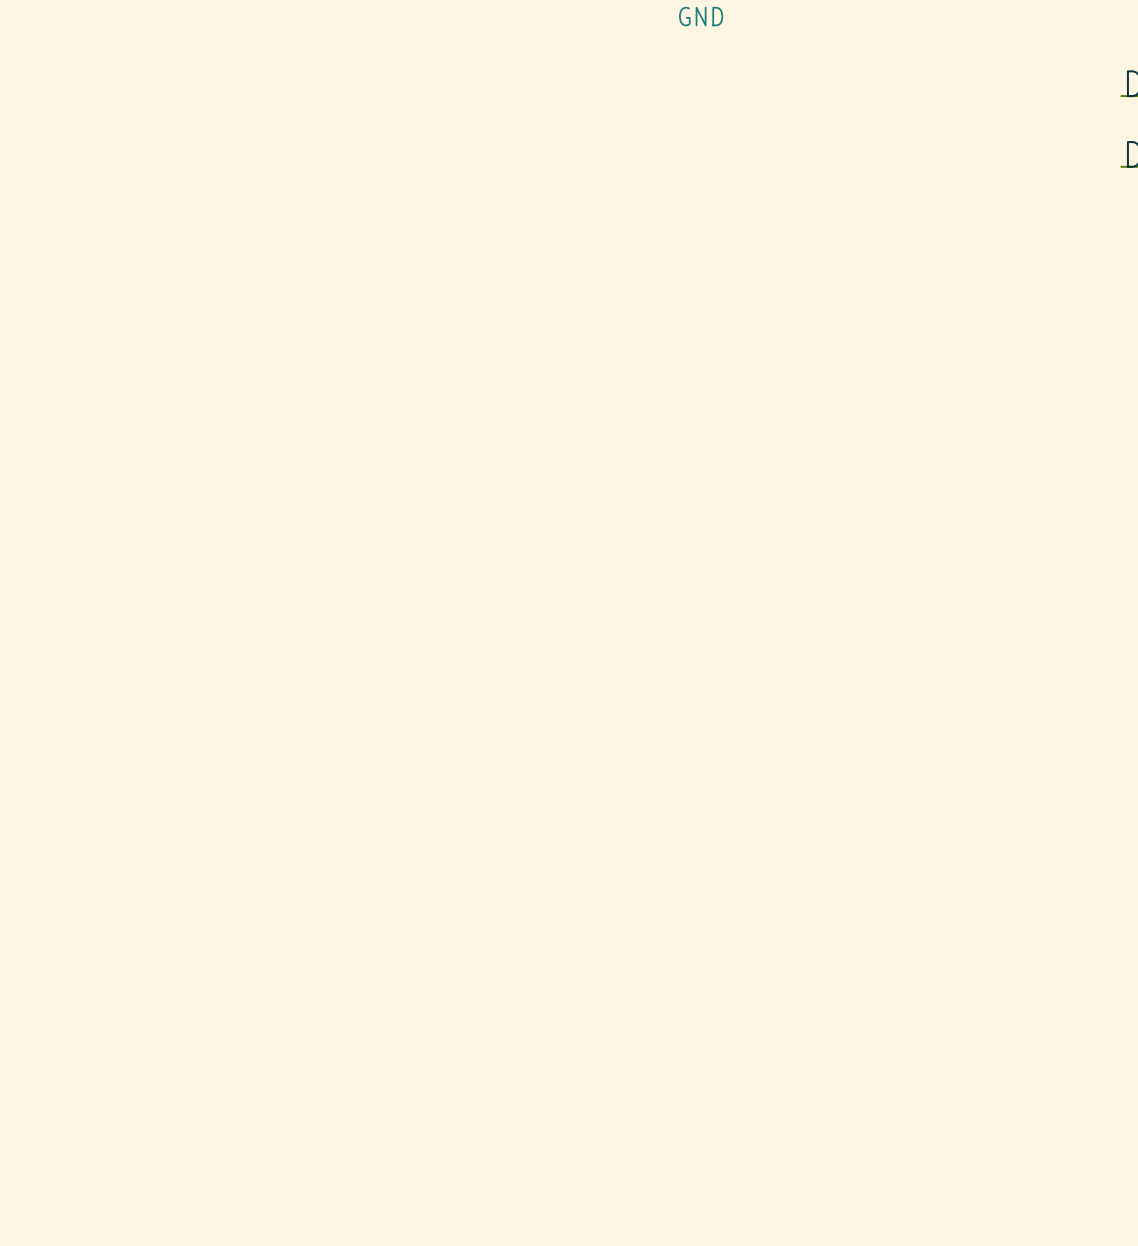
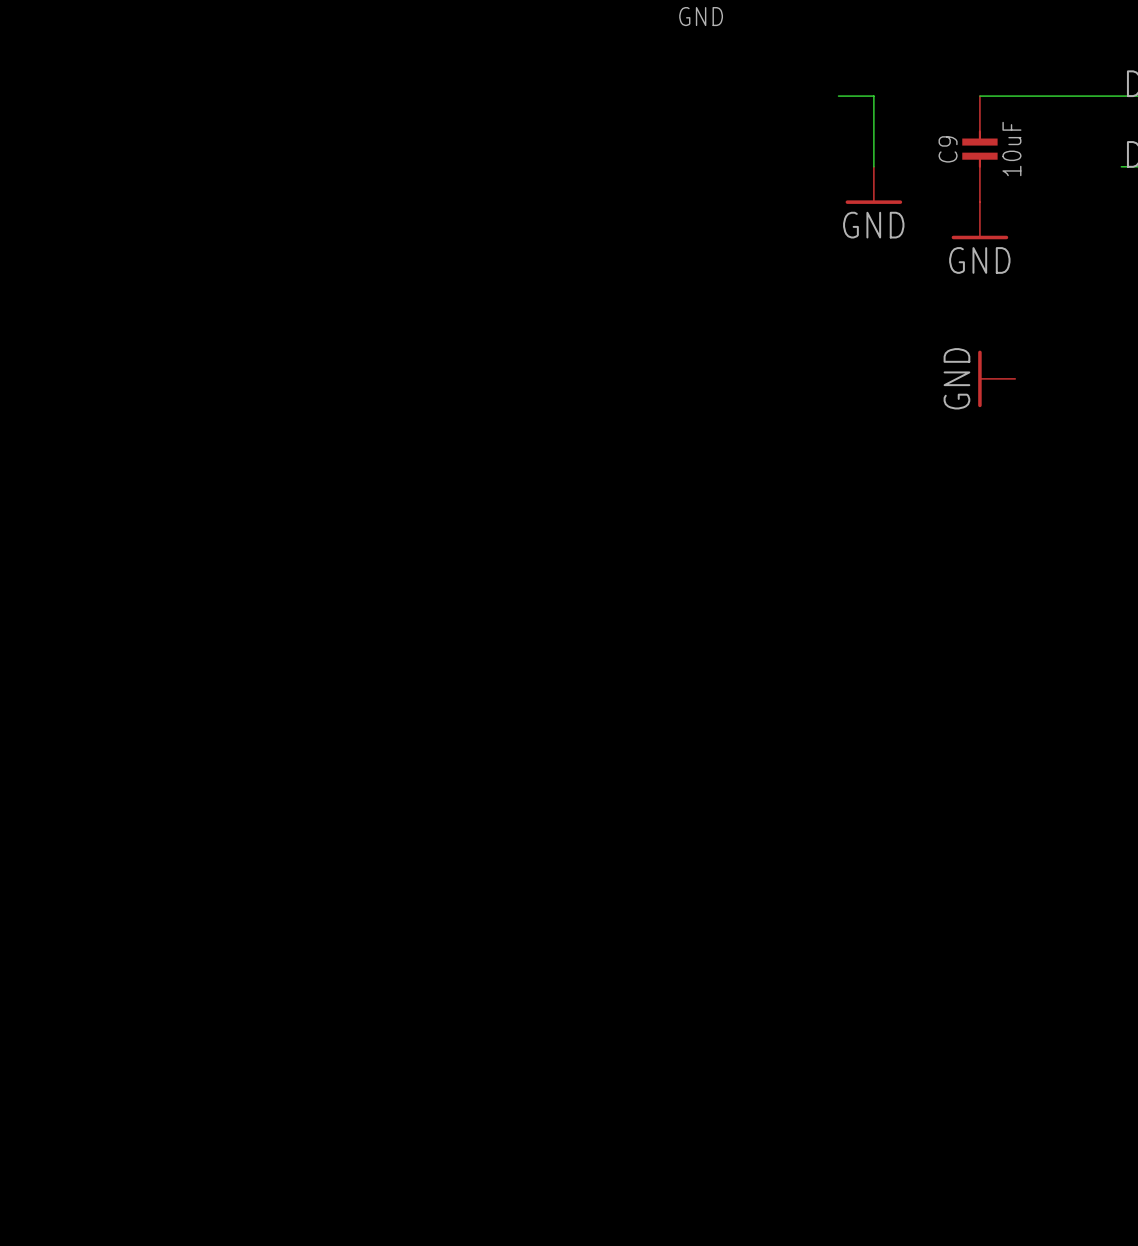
wire: none -> (838, 96) (873, 96) (873, 166)
wire: none -> (979, 96) (1121, 96)
C9: none -> 10uF (979, 149)
power symbol: none -> GND (873, 185)
power symbol: none -> GND (979, 220)
power symbol: none -> GND (996, 378)

